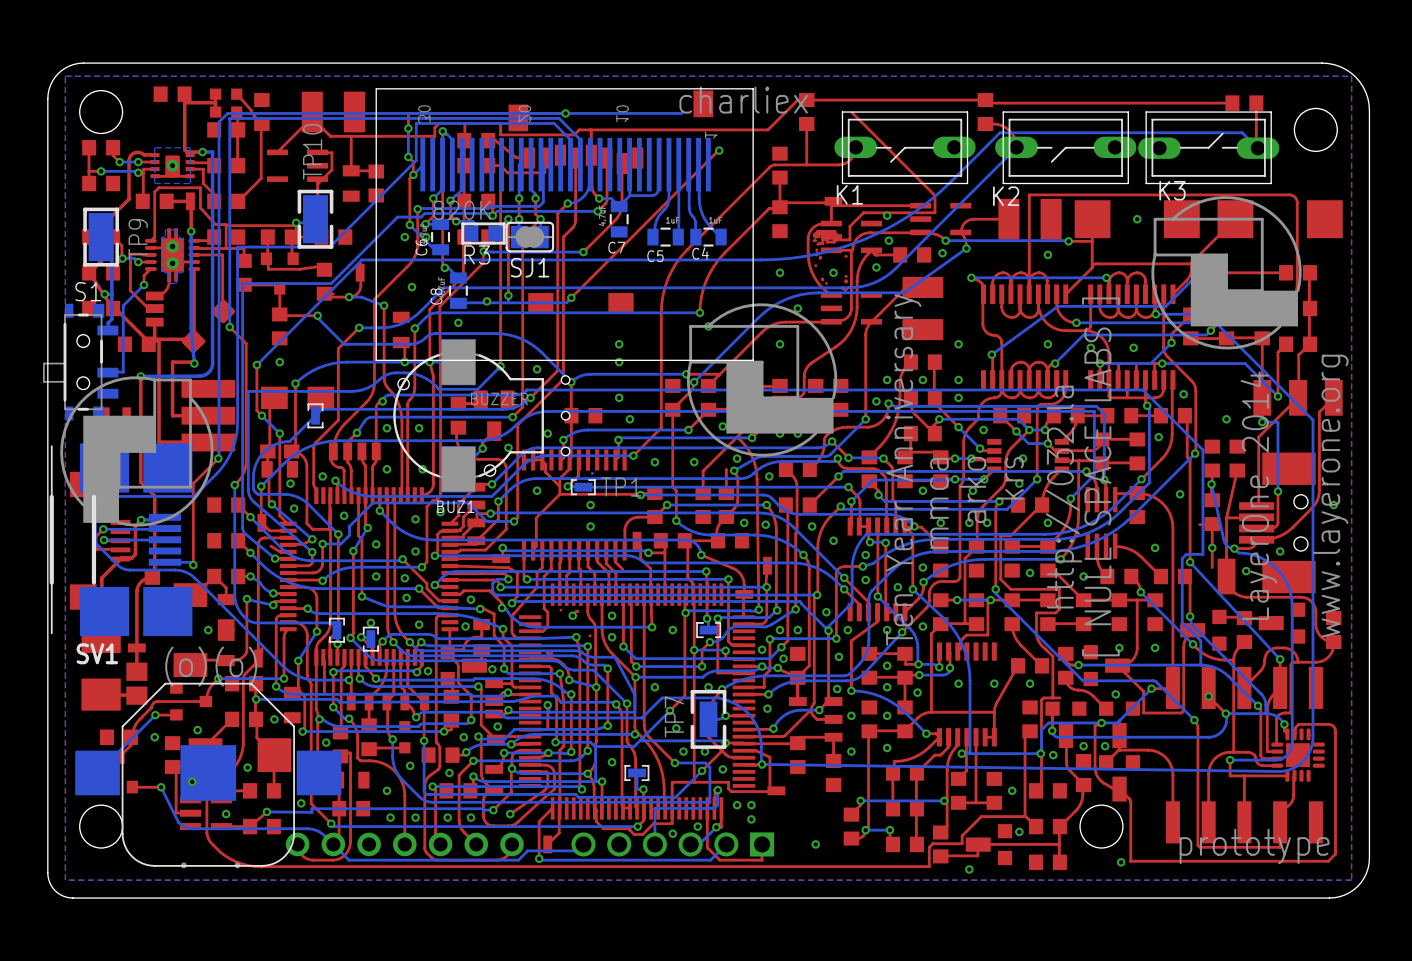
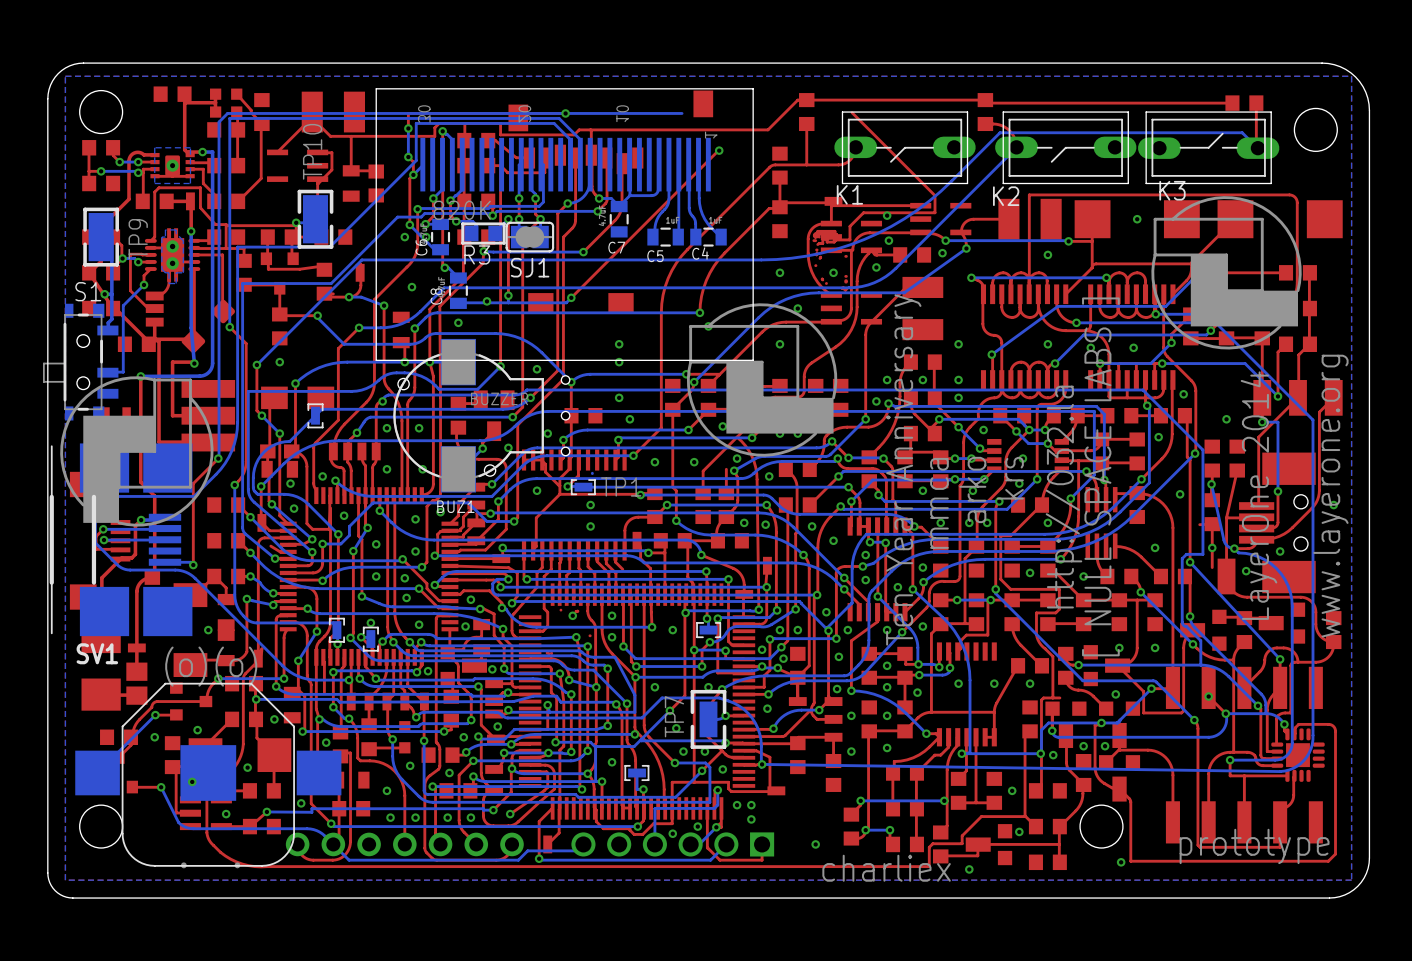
text: charliex (743, 100) -> none
text: none -> charliex (886, 868)

